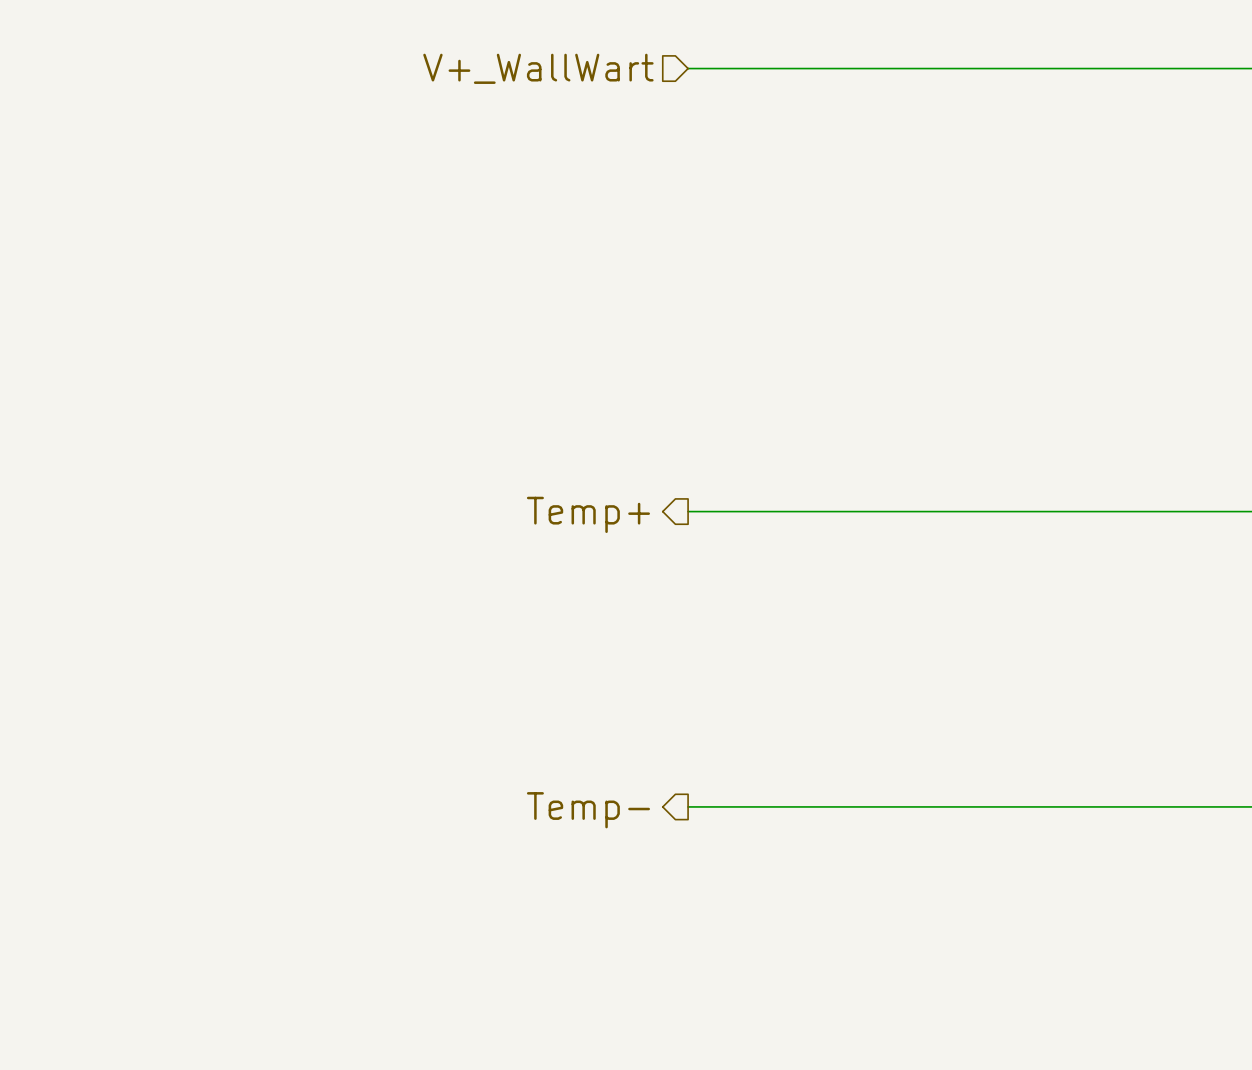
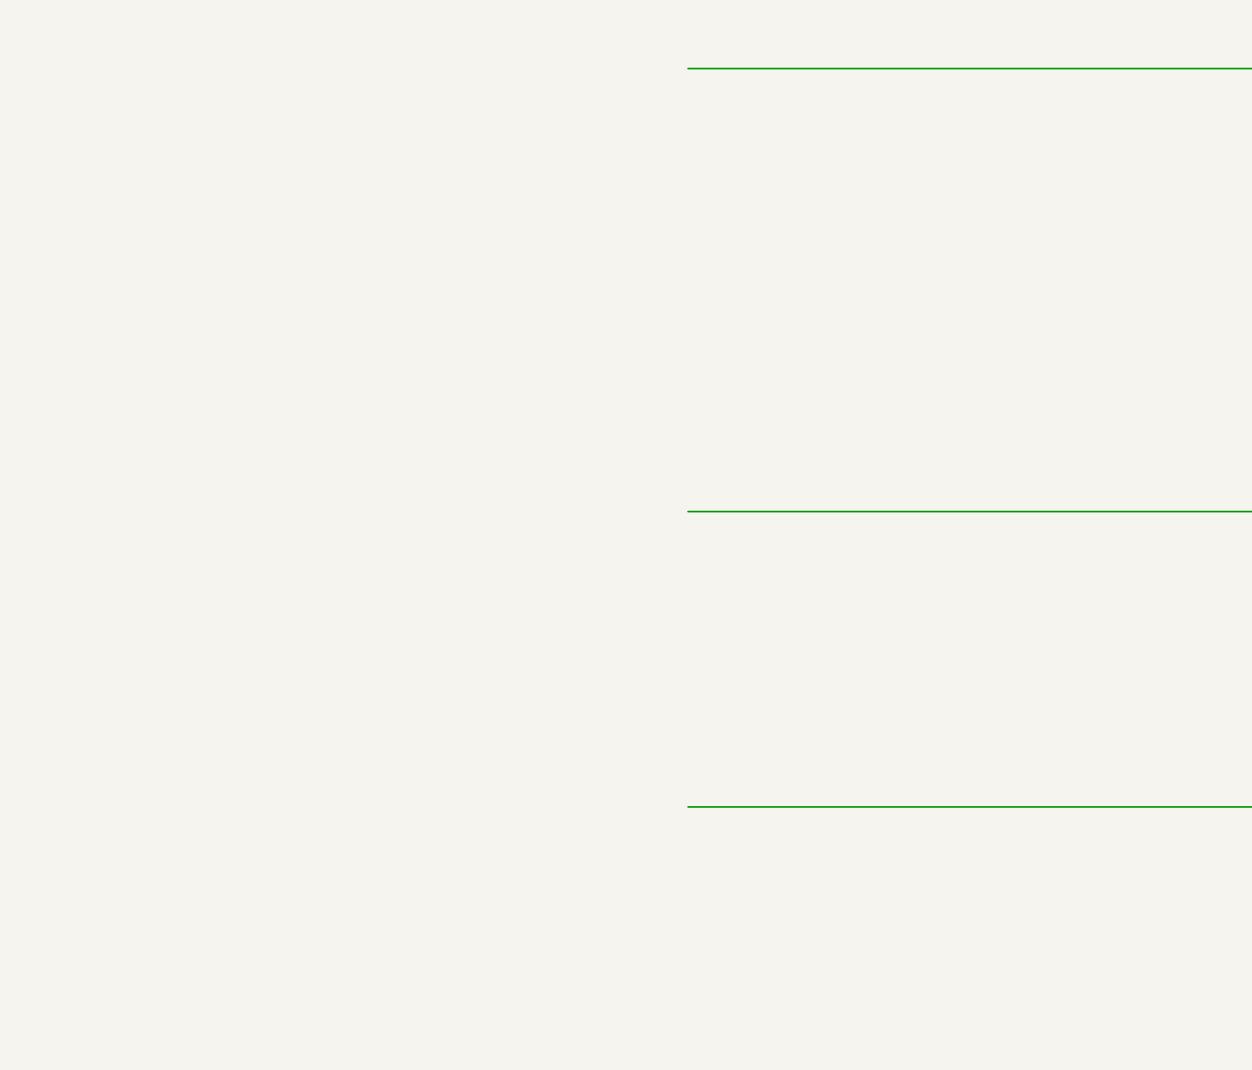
hierarchical label: V+_WallWart (538, 68) -> none
hierarchical label: Temp+ (588, 514) -> none
hierarchical label: Temp- (588, 810) -> none

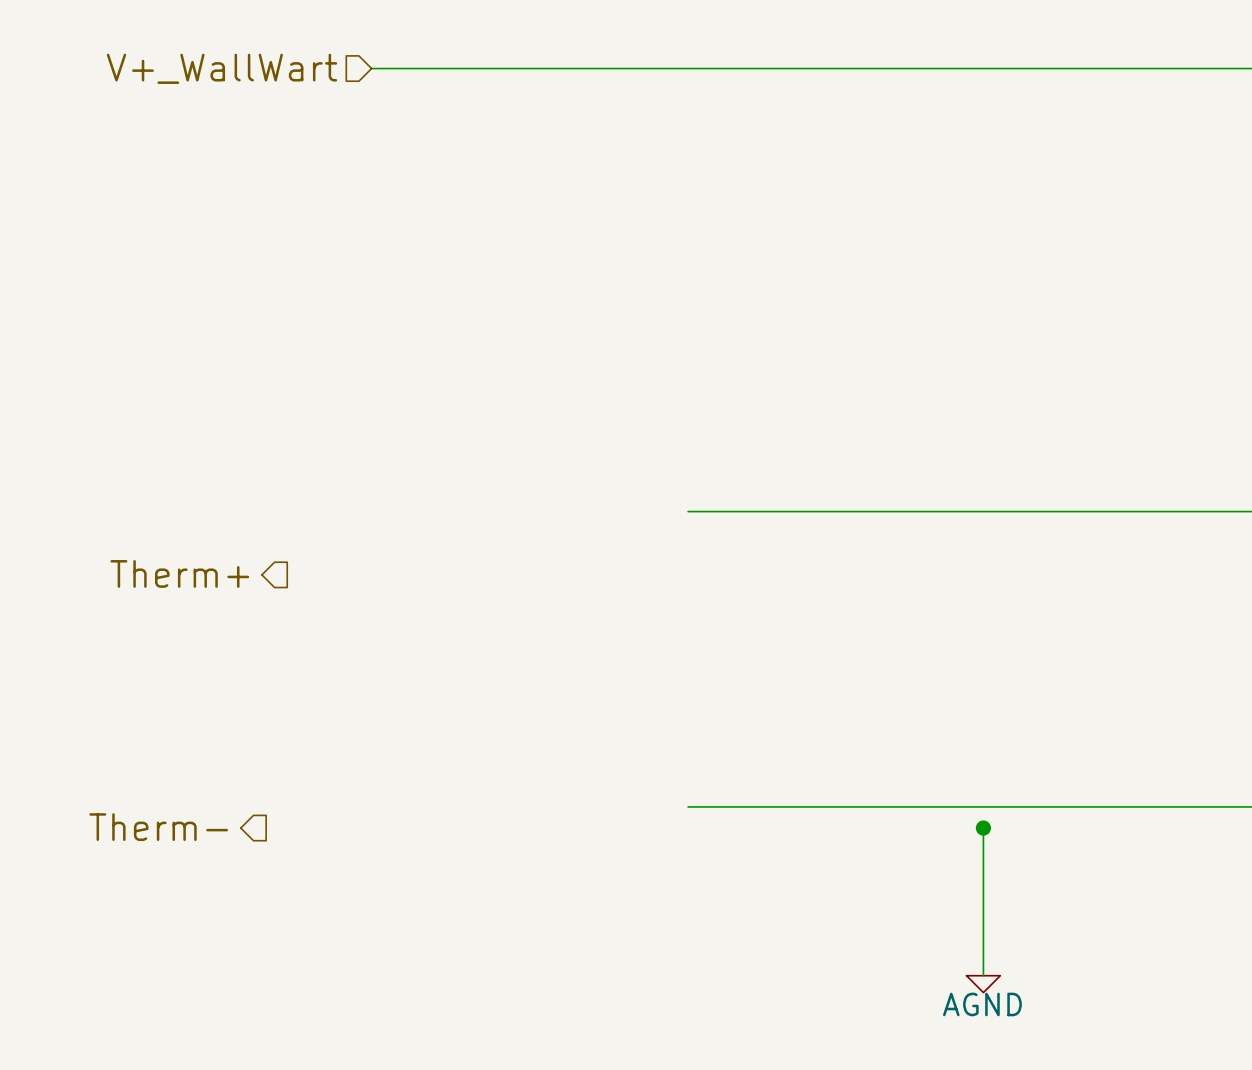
hierarchical label: none -> V+_WallWart (221, 68)
wire: none -> (371, 68) (688, 68)
hierarchical label: none -> Therm+ (179, 573)
hierarchical label: none -> Therm- (158, 827)
wire: none -> (983, 828) (983, 975)
junction: none -> (983, 828)
power symbol: none -> AGND (983, 984)

